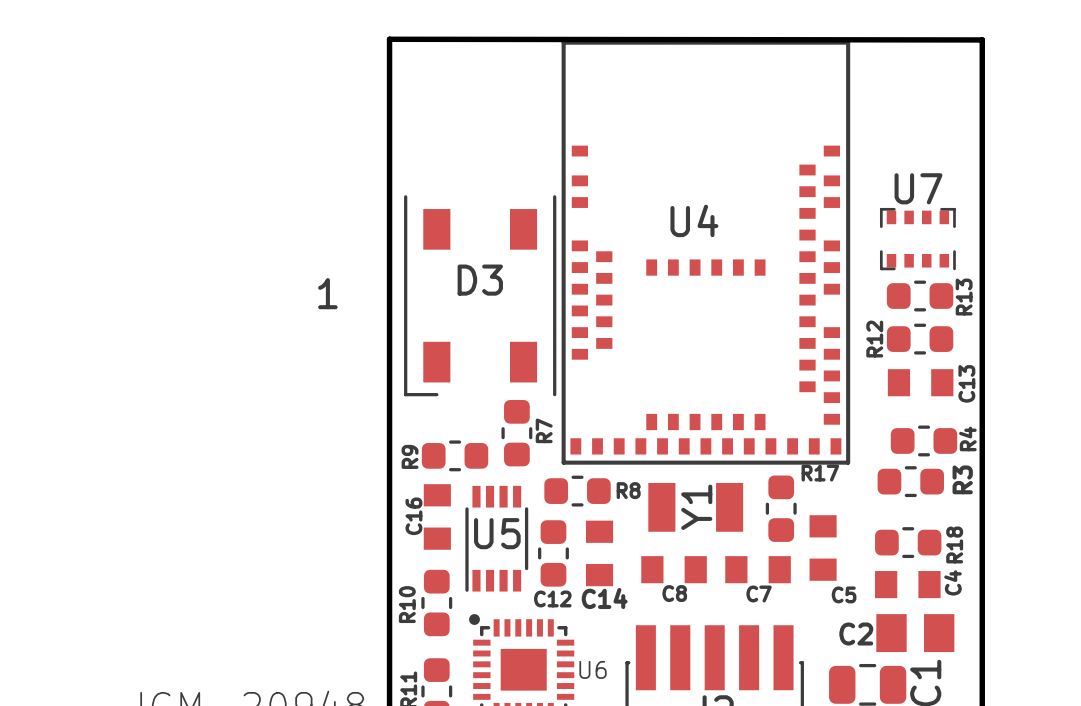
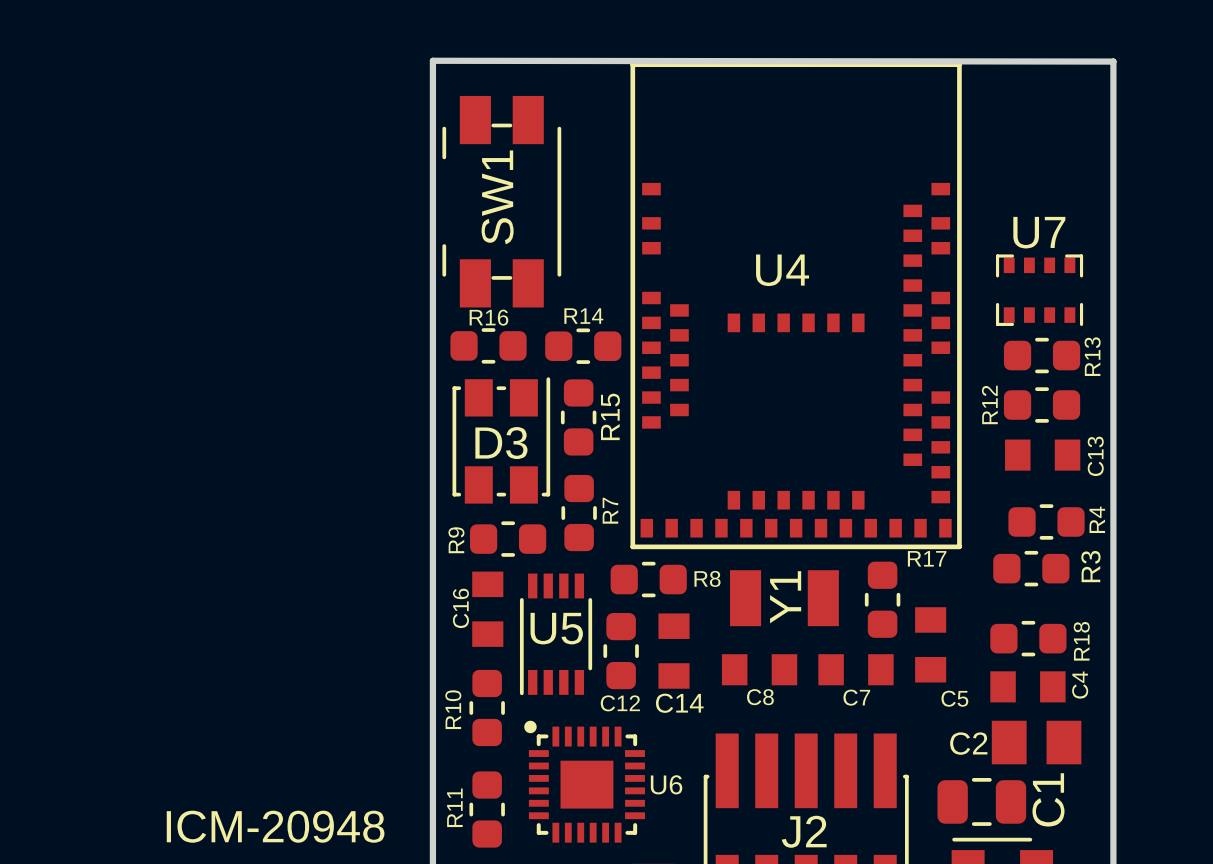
SW1: none -> (501, 201)
D3 footprint: [404, 195, 557, 397] -> [452, 377, 551, 504]
R16: none -> (488, 345)
R14: none -> (583, 346)
R15: none -> (578, 417)

